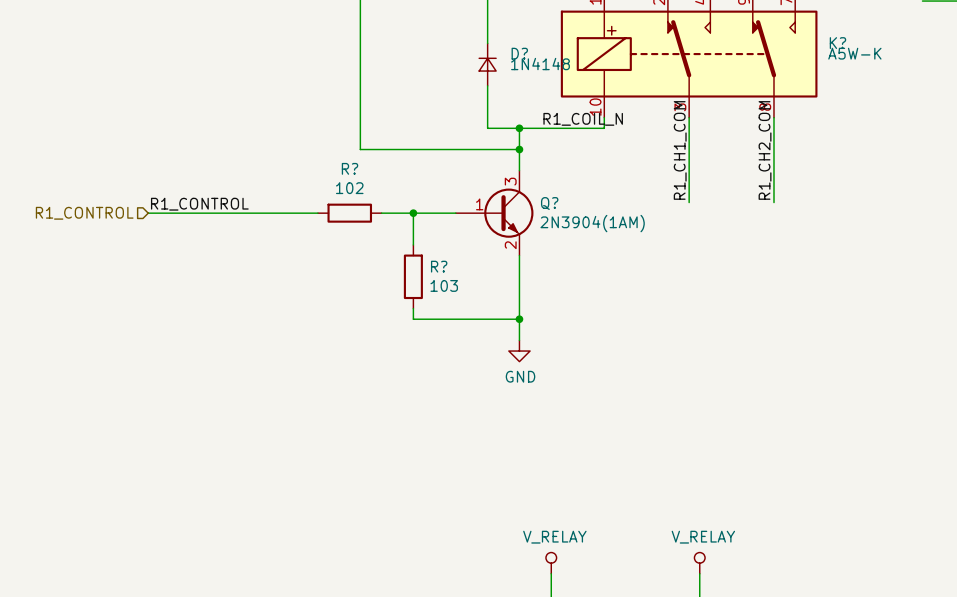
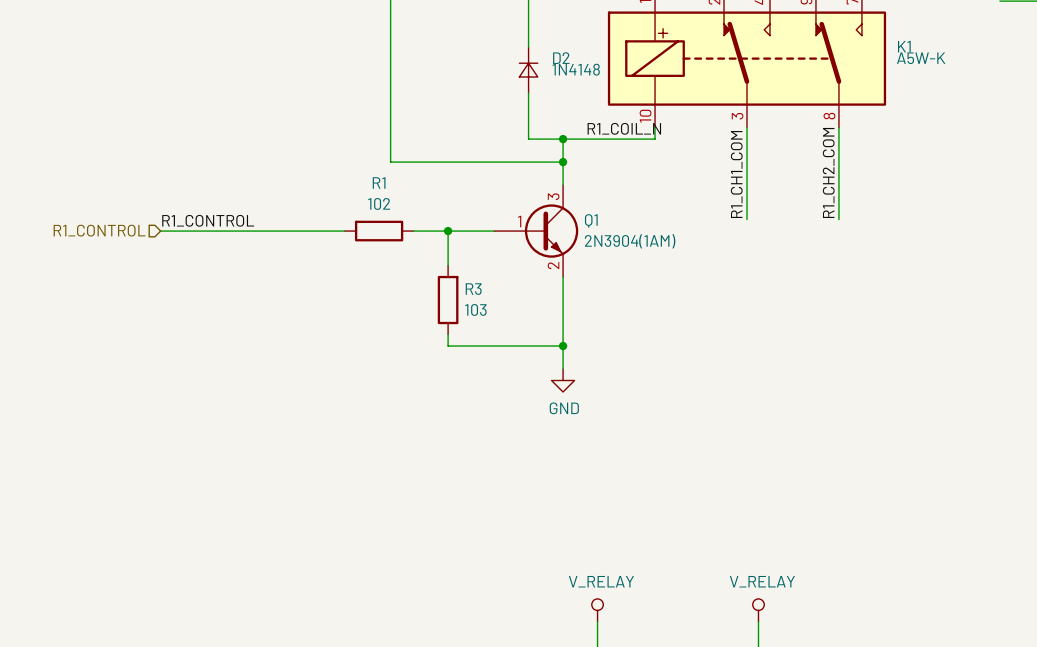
K? name: K? (837, 43) -> K1 (904, 46)
D? name: D? (519, 53) -> D2 (561, 58)
R? name: R? (350, 168) -> R1 (379, 183)
Q? name: Q? (549, 203) -> Q1 (591, 220)
R? name: R? (439, 266) -> R3 (473, 289)

